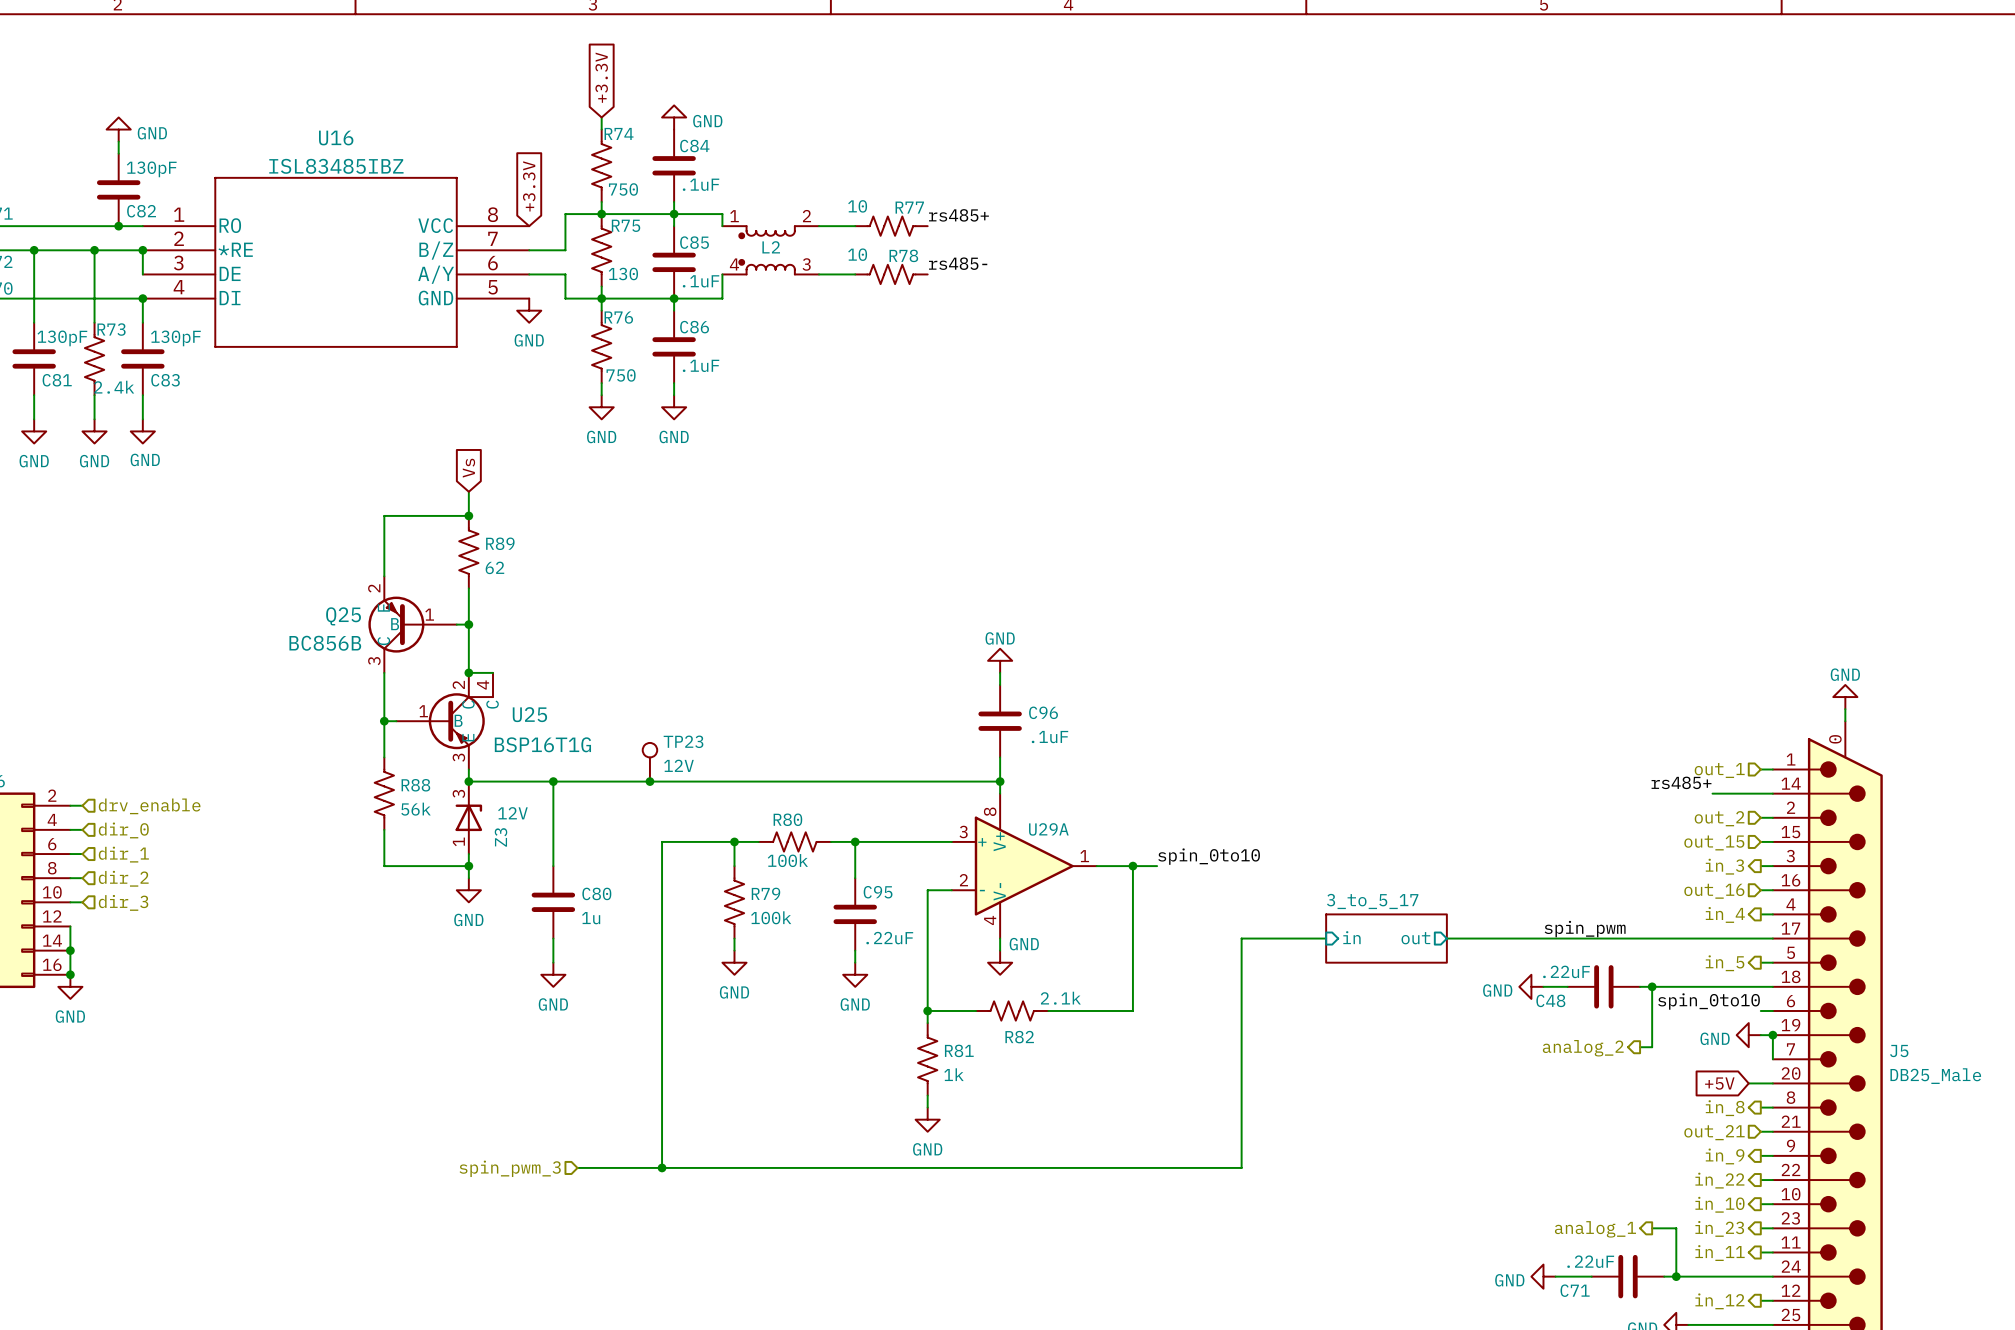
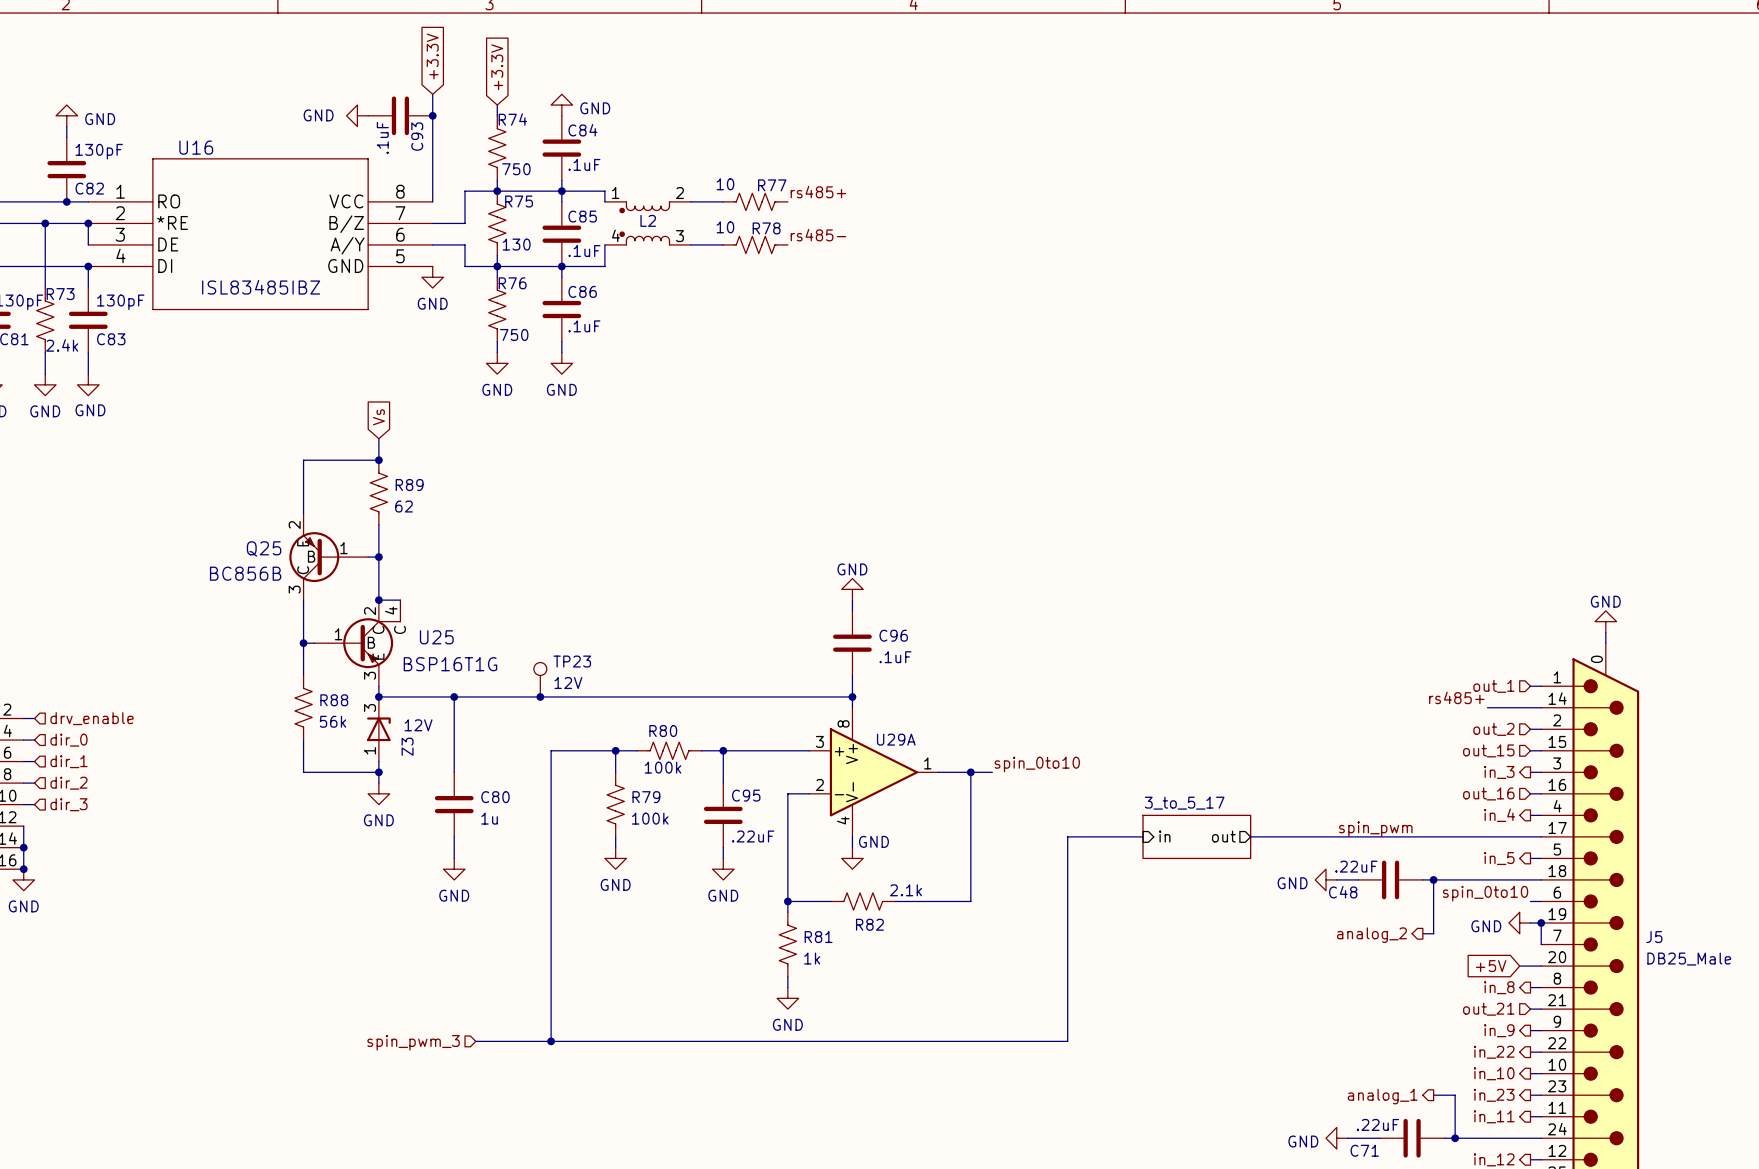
wire: none -> (432, 94) (432, 201)
power symbol: none -> GND (357, 115)
C93: none -> .1uF (400, 115)
junction: none -> (432, 115)
U16 name position: U16 (336, 138) -> U16 (196, 147)
U16 value position: ISL83485IBZ (336, 166) -> ISL83485IBZ (261, 287)
global label position: +3.3V (529, 186) -> +3.3V (432, 56)

